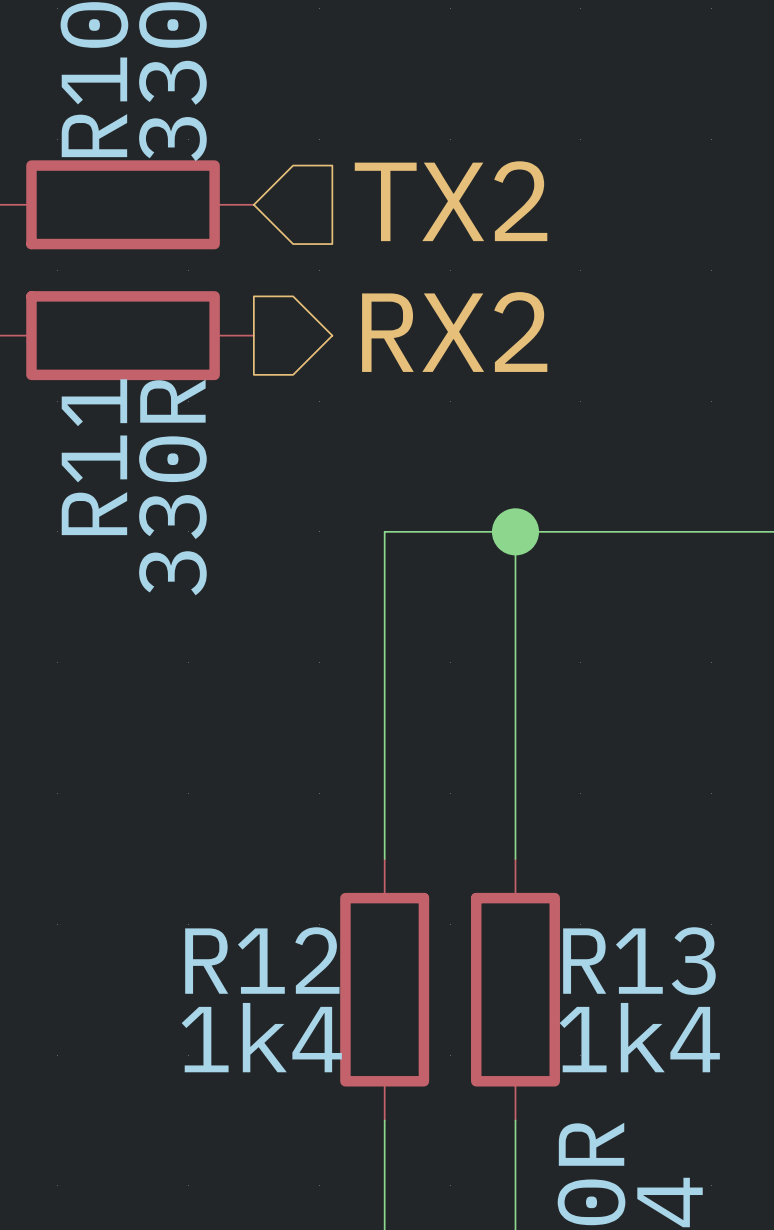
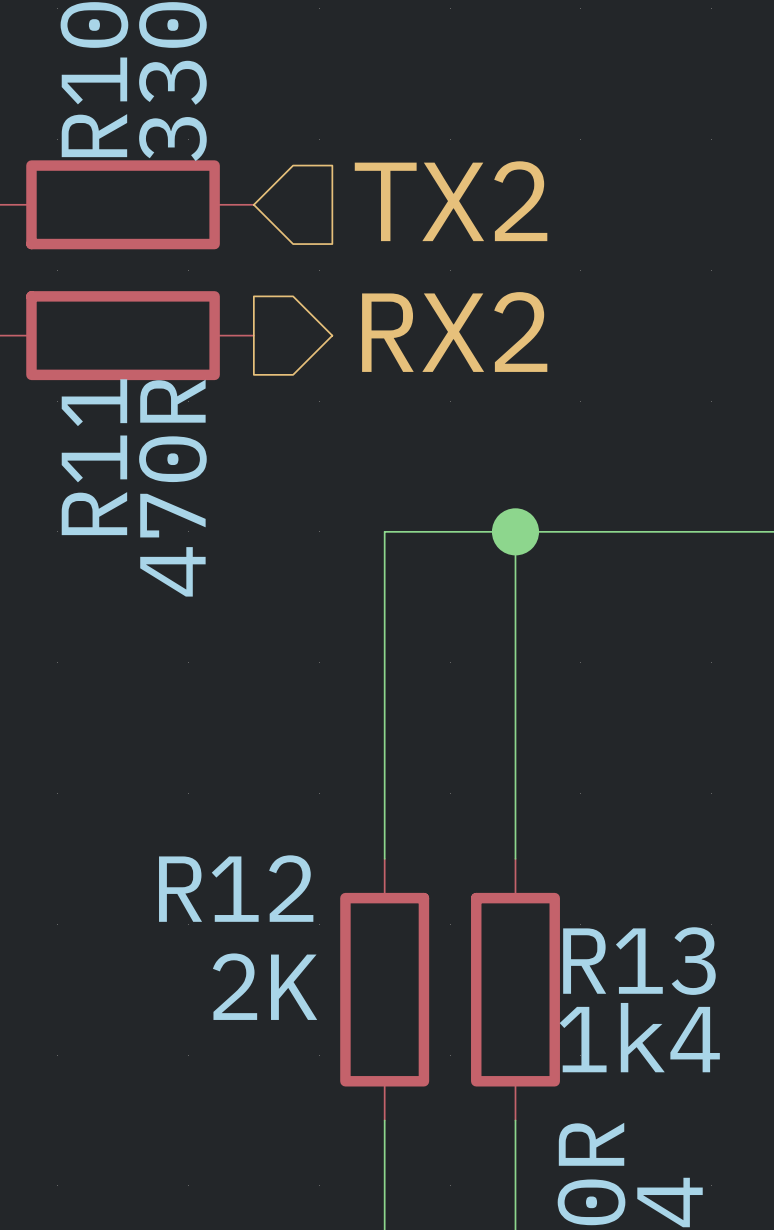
R11 value: 330R (172, 487) -> 470R (172, 488)
R12 name position: R12 (262, 960) -> R12 (236, 888)
R12 value: 1k4 (261, 1037) -> 2K (265, 986)

